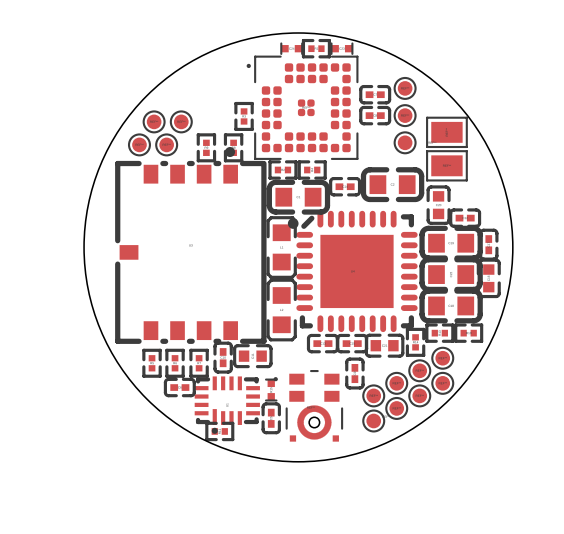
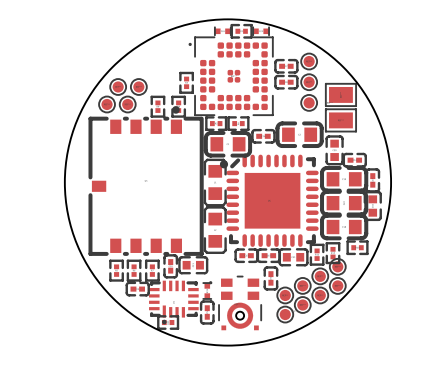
part rotation: 0° (439, 333) -> 90° clockwise (333, 253)

